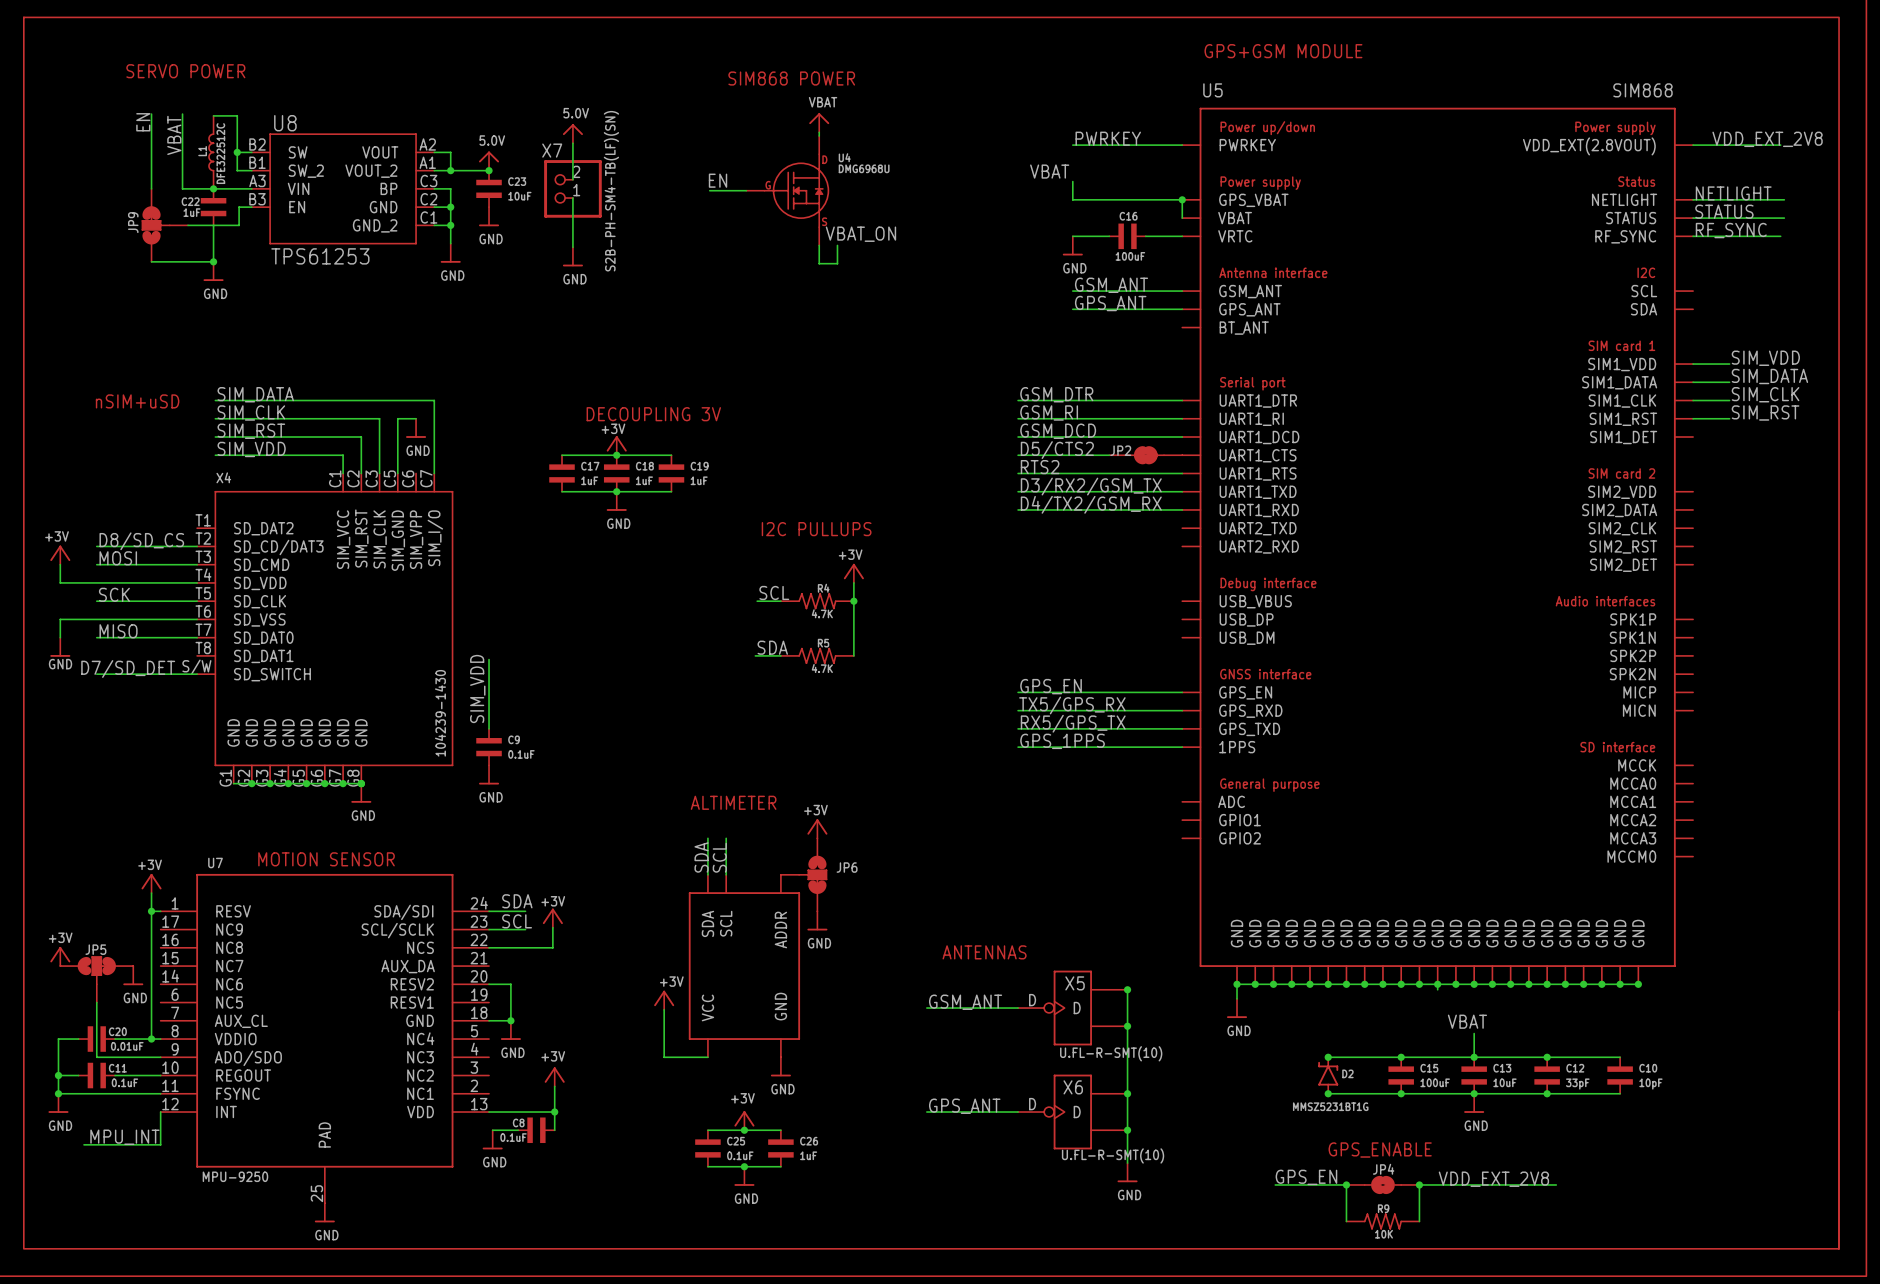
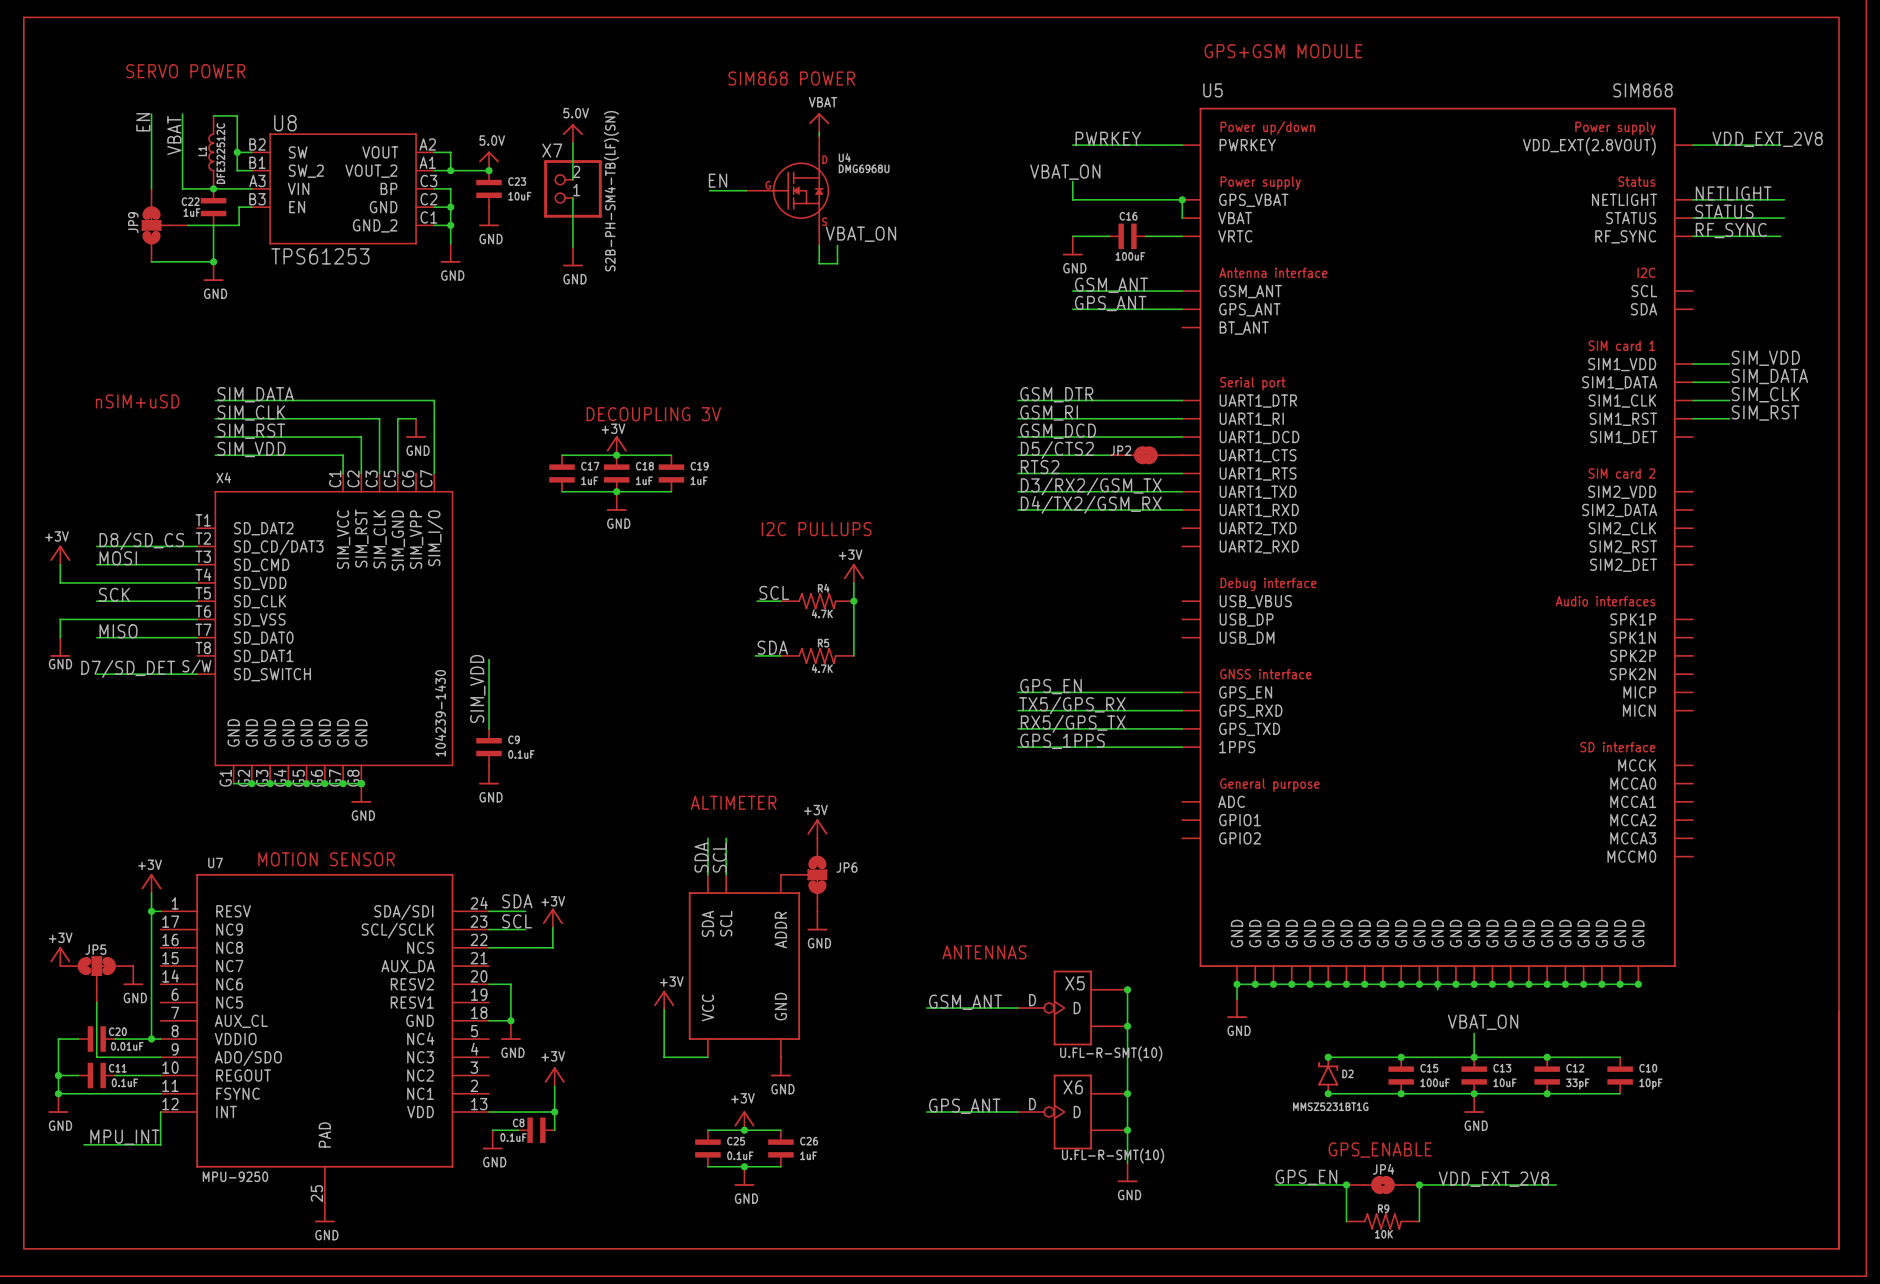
label: VBAT (1049, 171) -> VBAT_ON (1065, 172)
label: VBAT (1467, 1021) -> VBAT_ON (1483, 1022)

